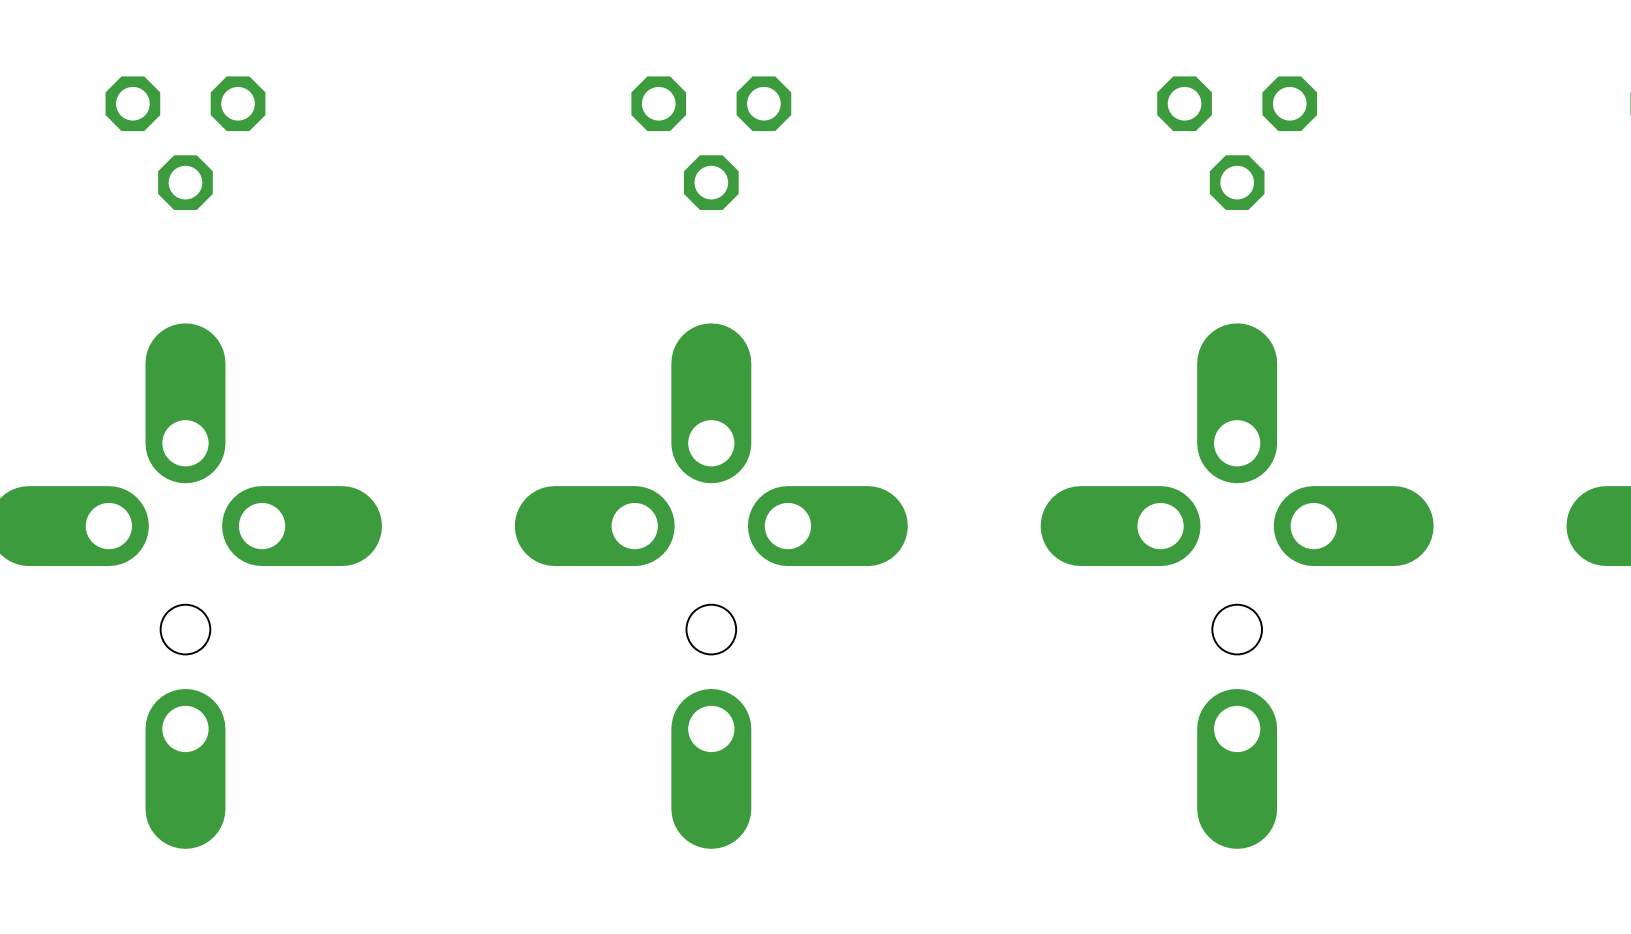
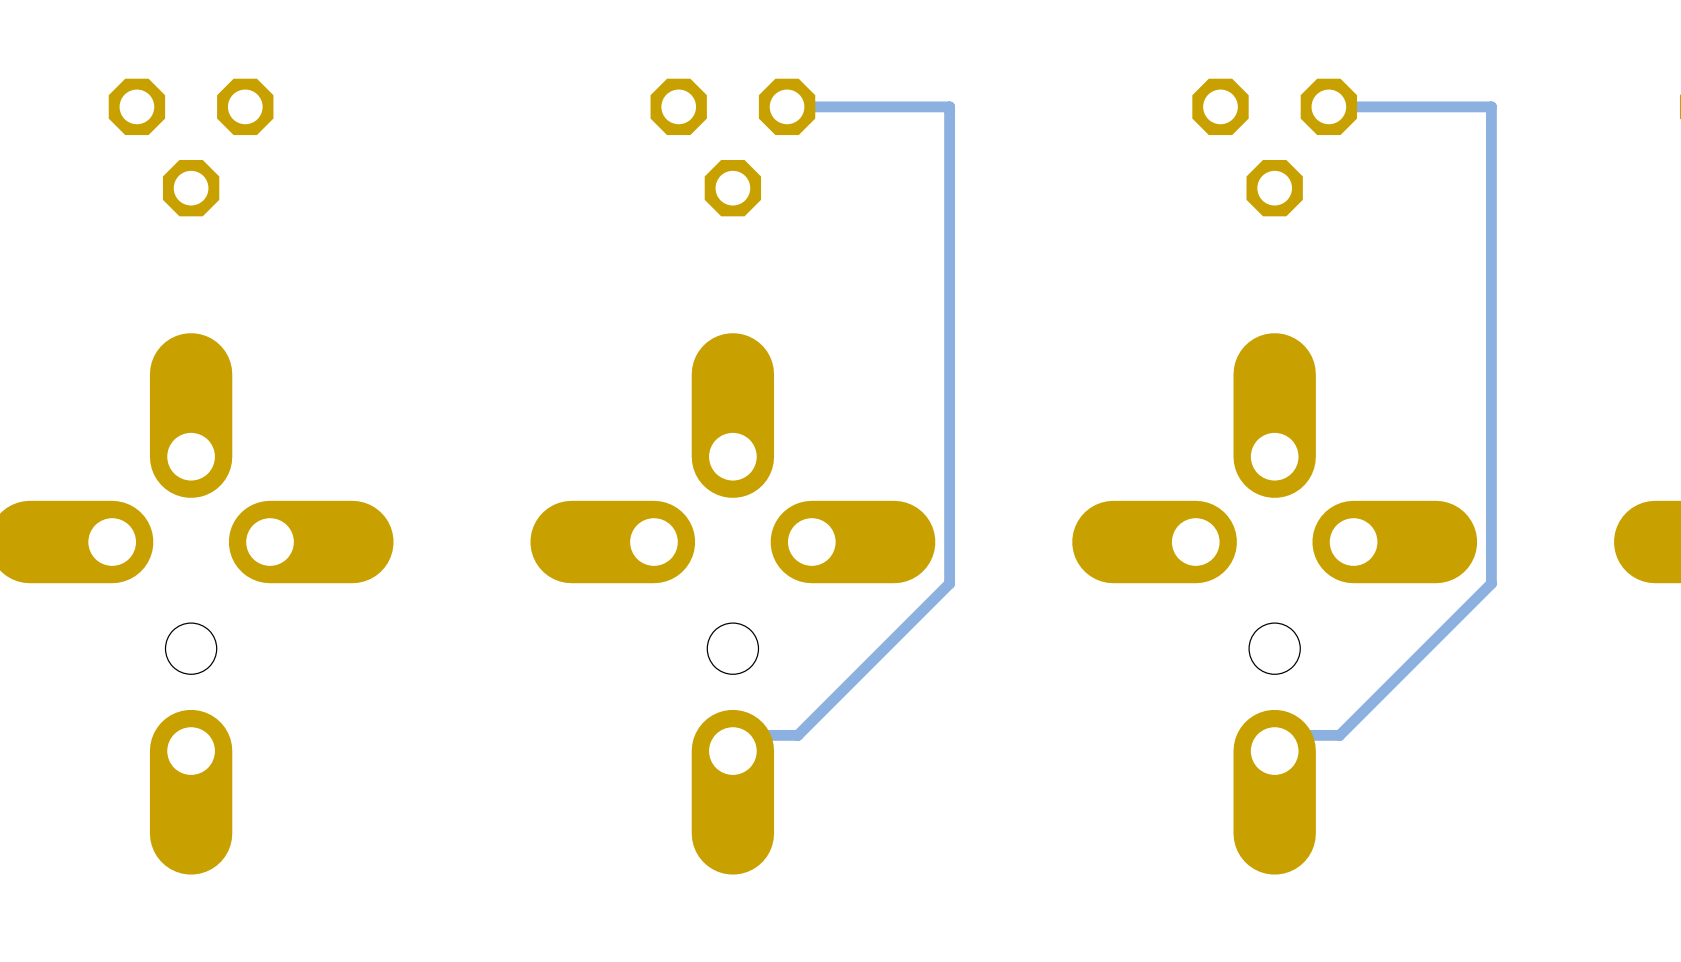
track: none -> (787, 106) (949, 106) (949, 583) (797, 735) (732, 735) (732, 751)
track: none -> (1328, 106) (1491, 106) (1491, 583) (1339, 735) (1274, 735) (1274, 751)

